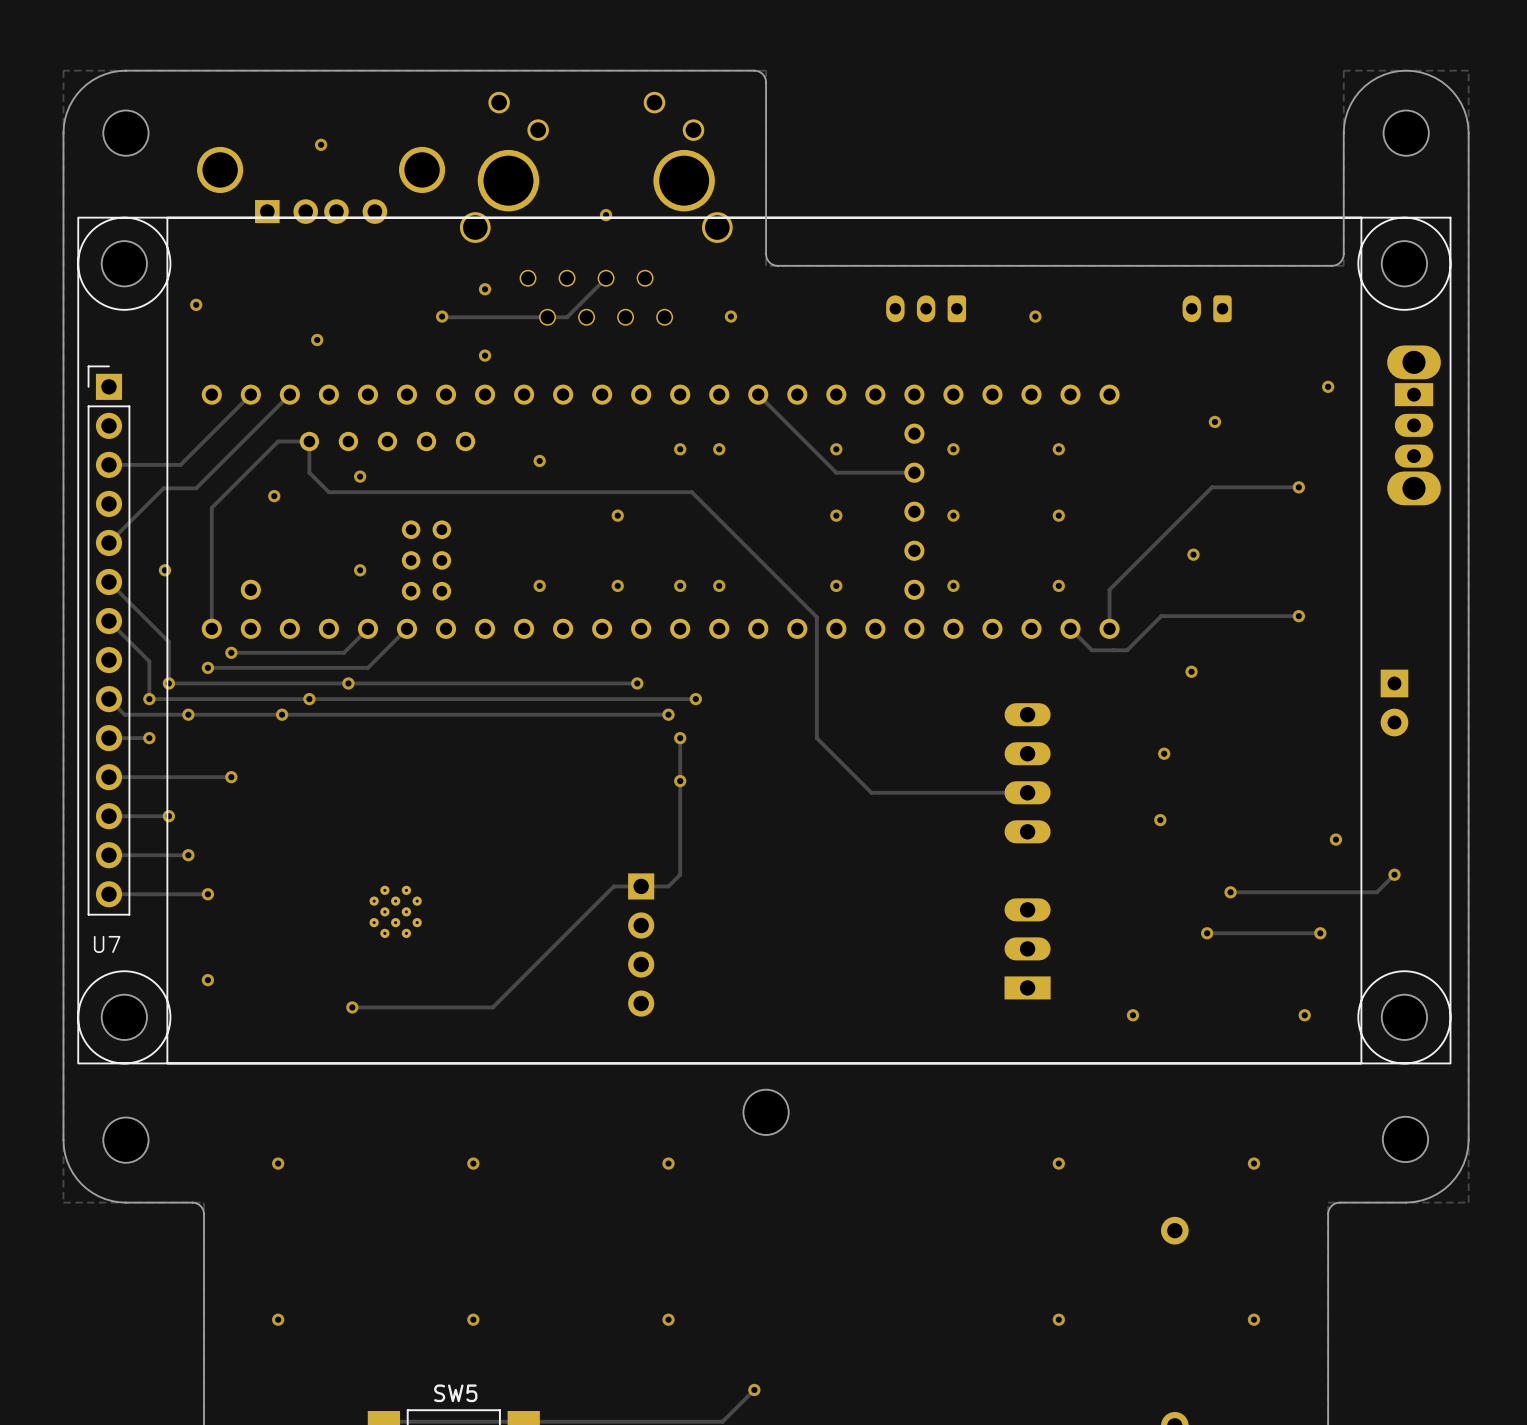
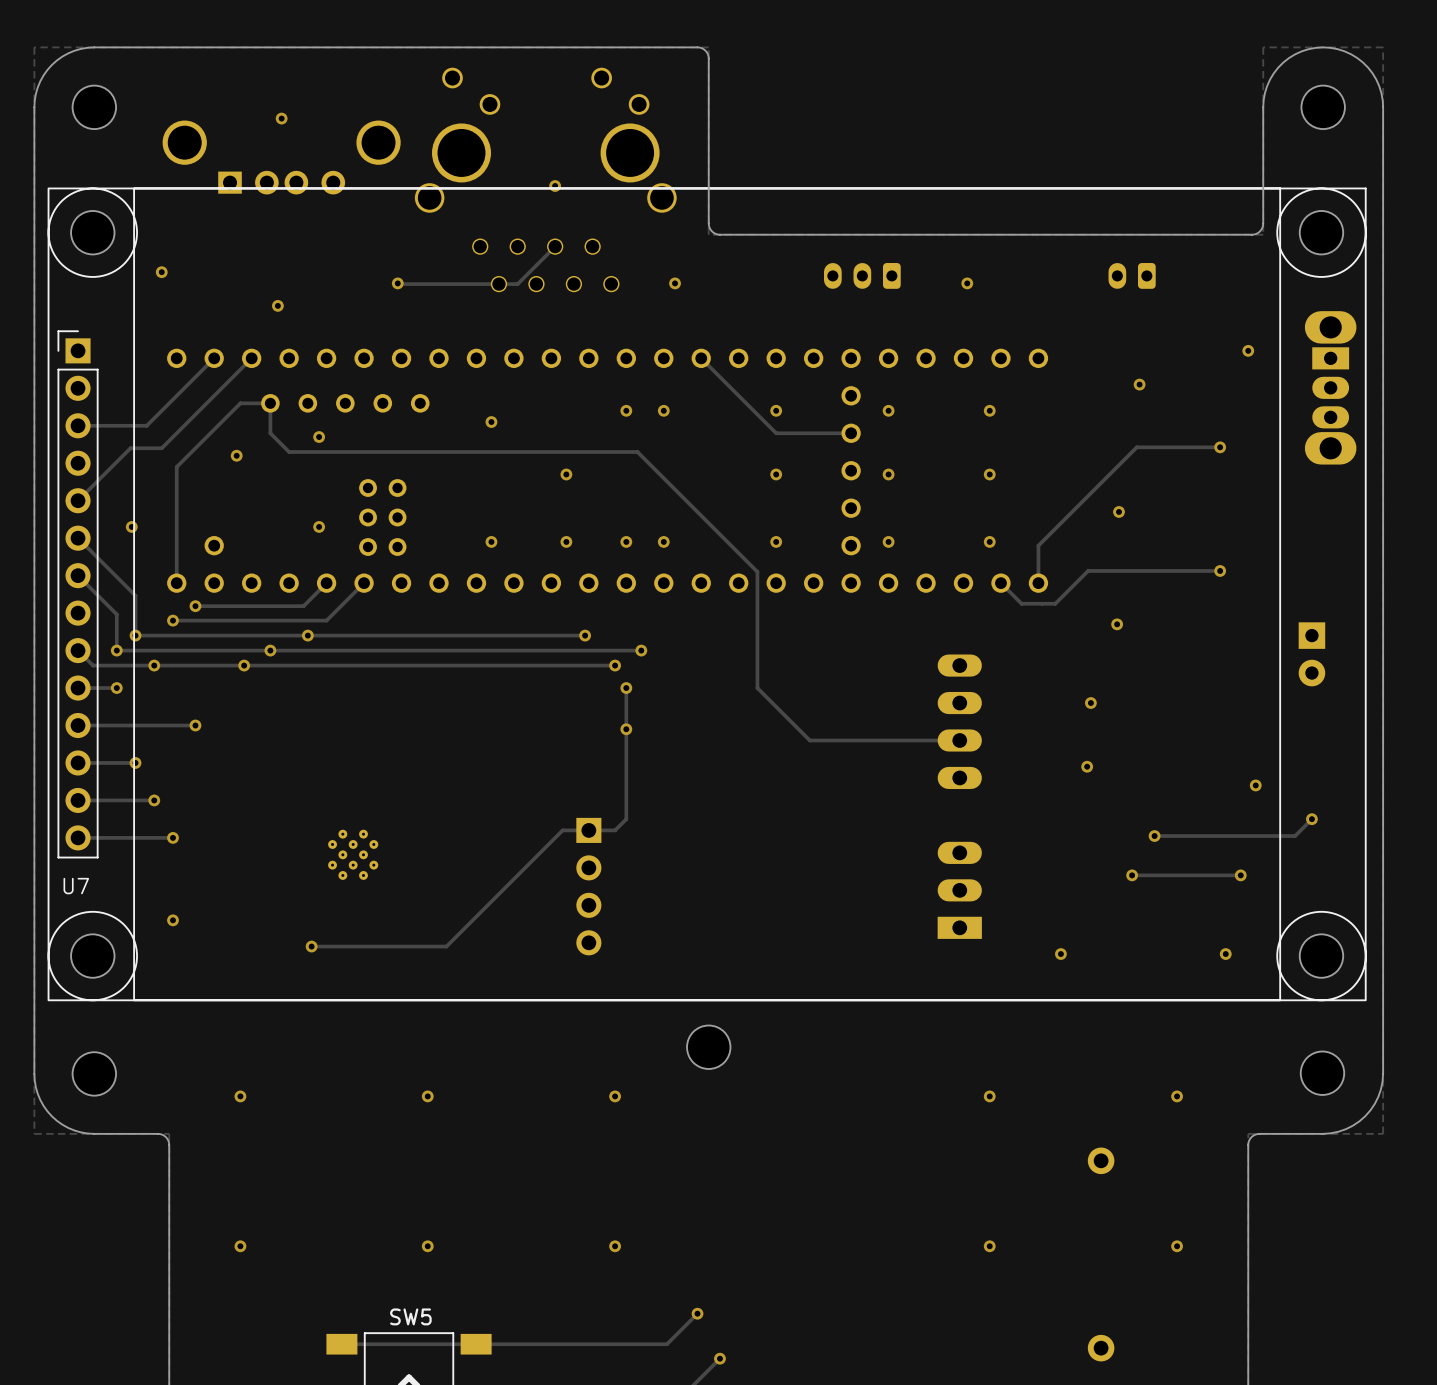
via: (485, 289) -> none
via: (485, 355) -> none

